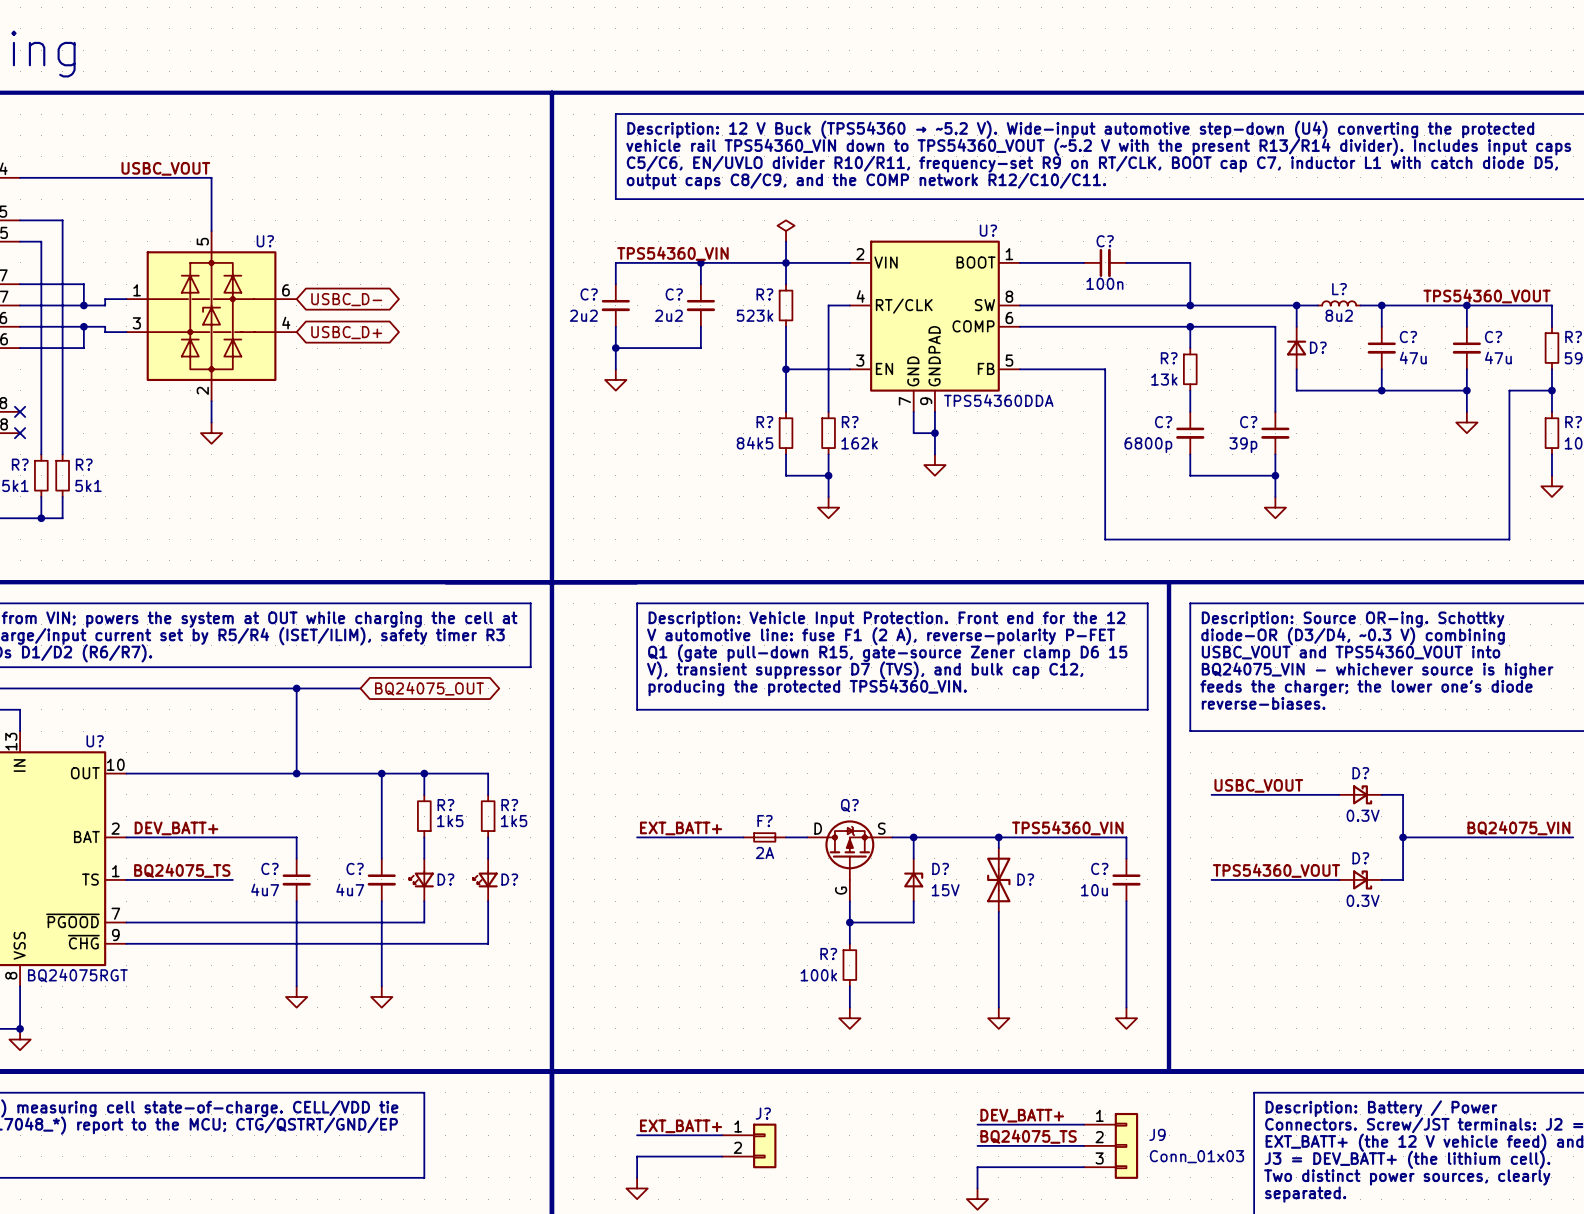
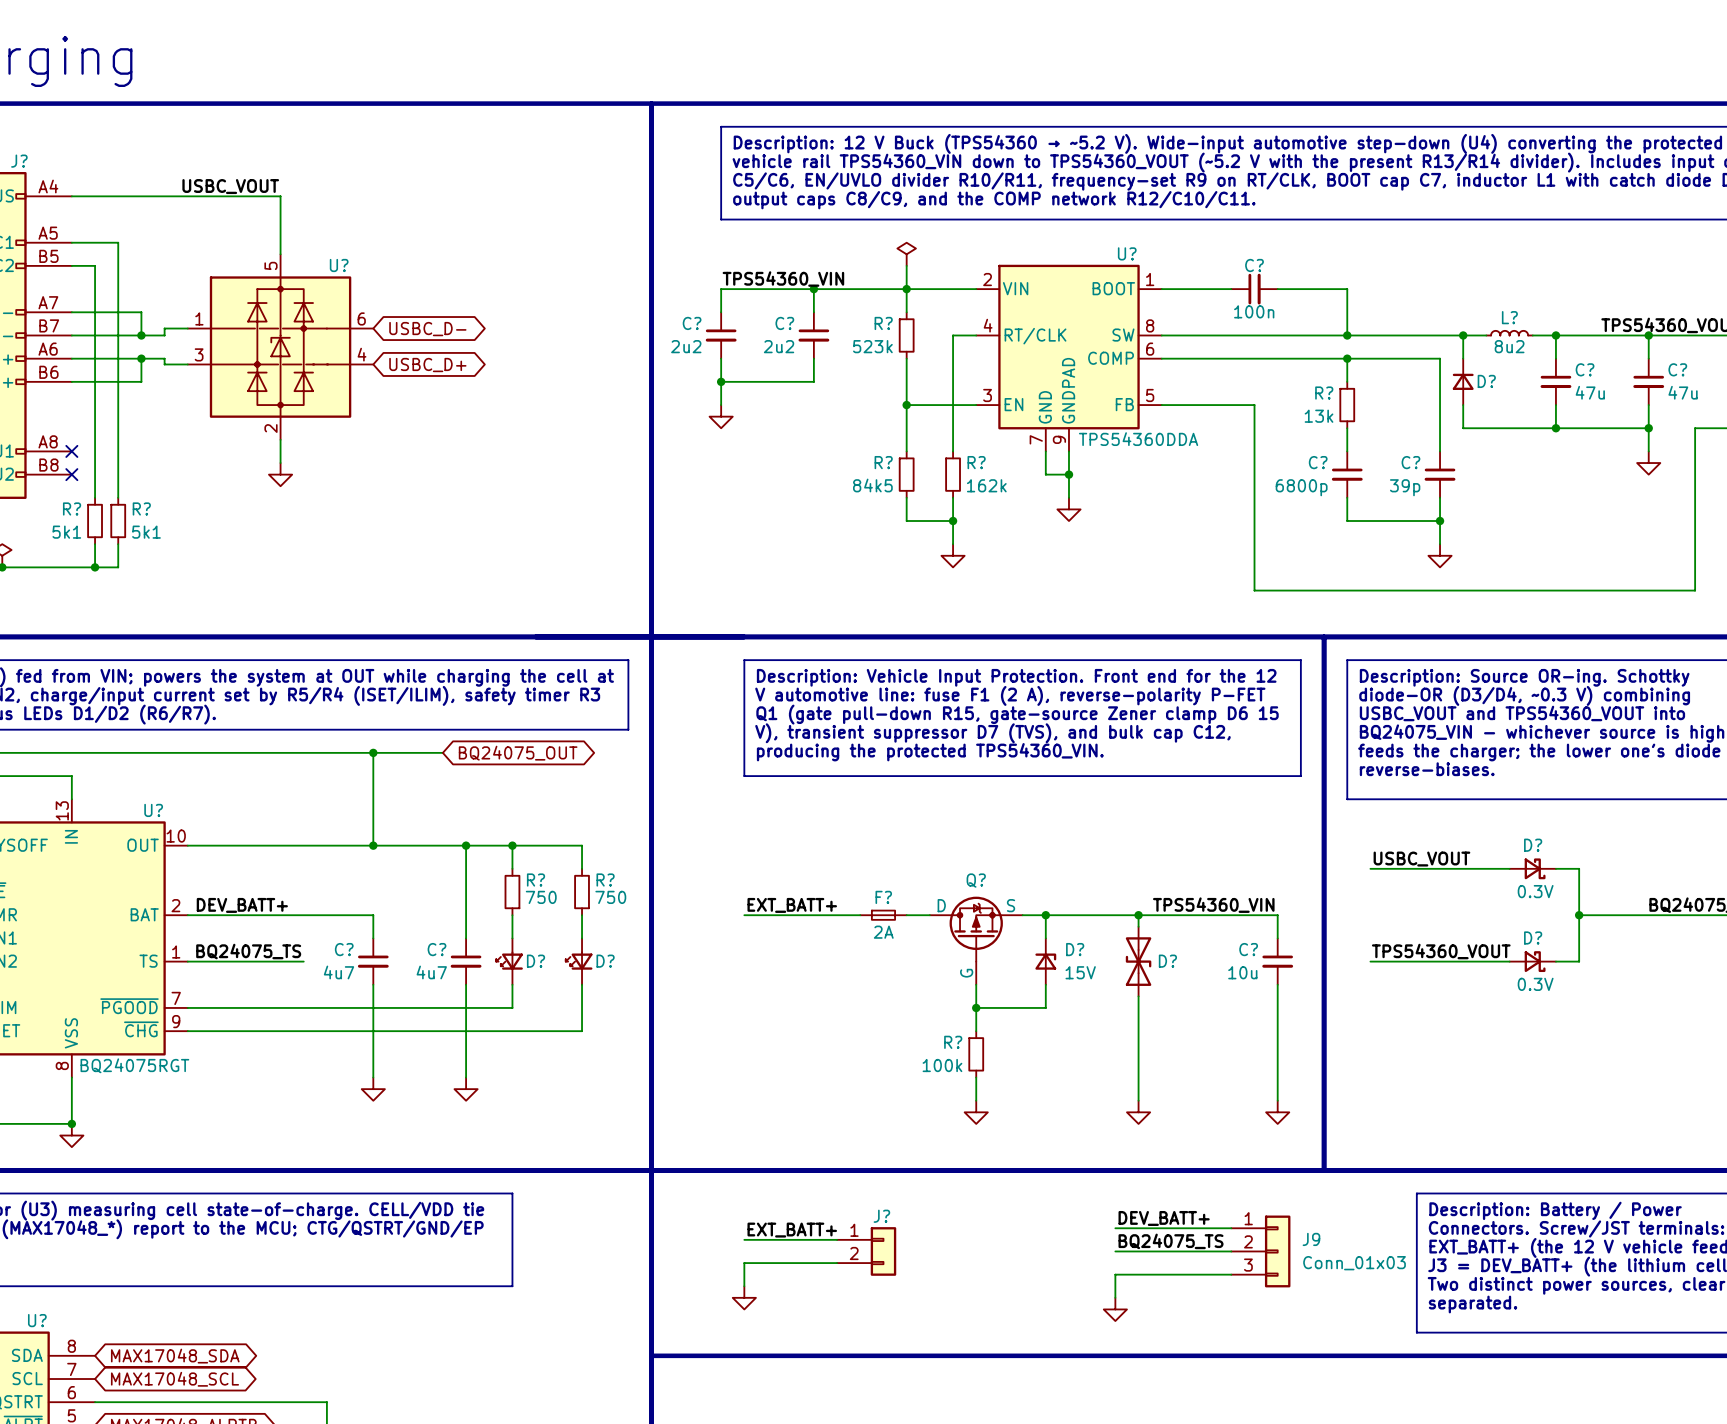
R? value: 1k5 (450, 821) -> 750 (541, 897)
R? value: 1k5 (514, 821) -> 750 (610, 897)

